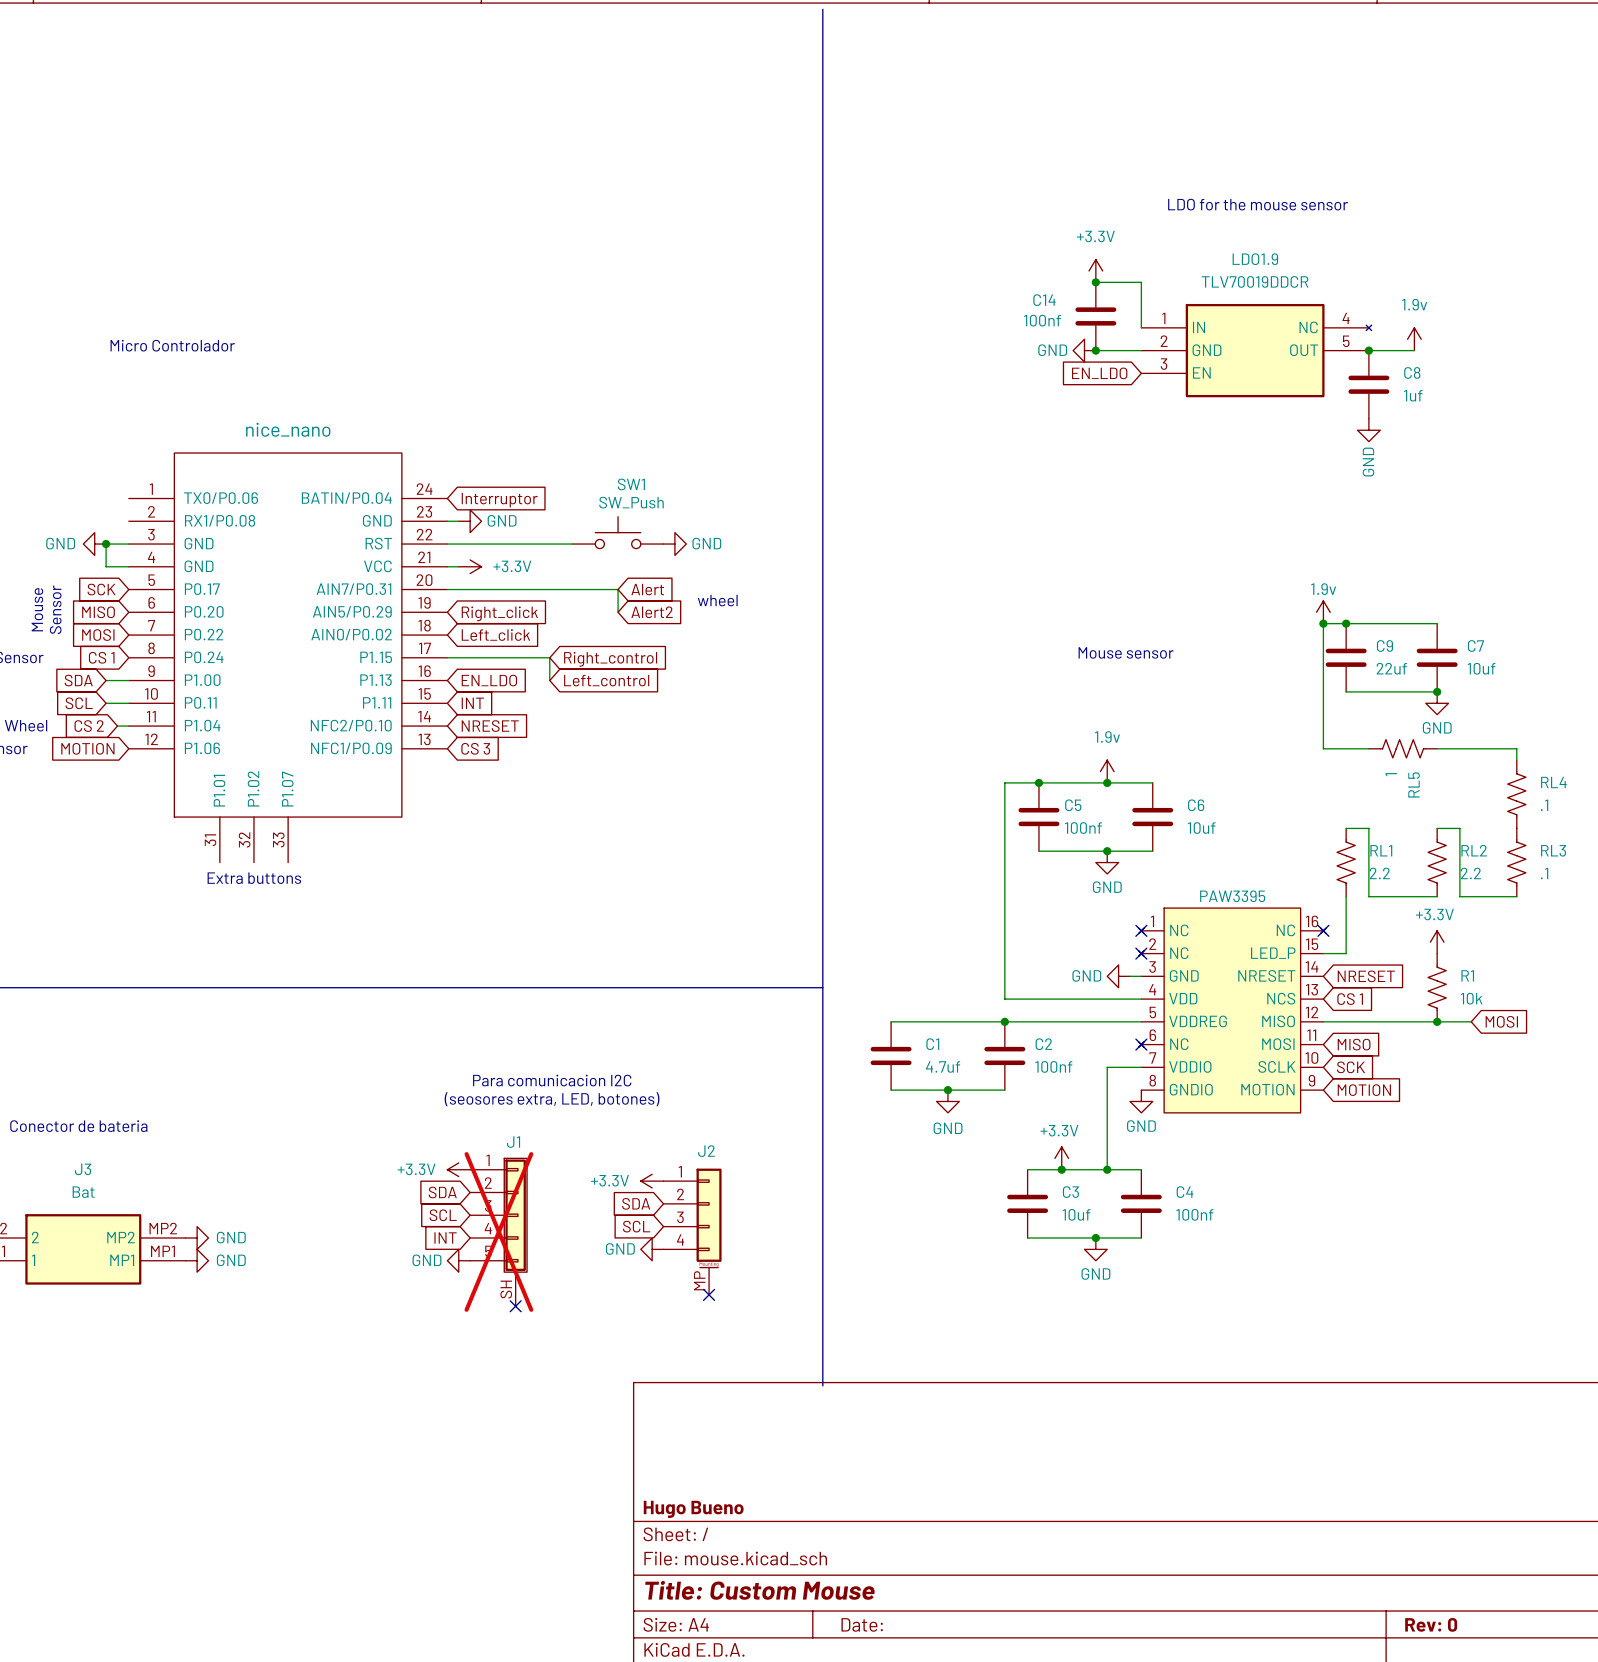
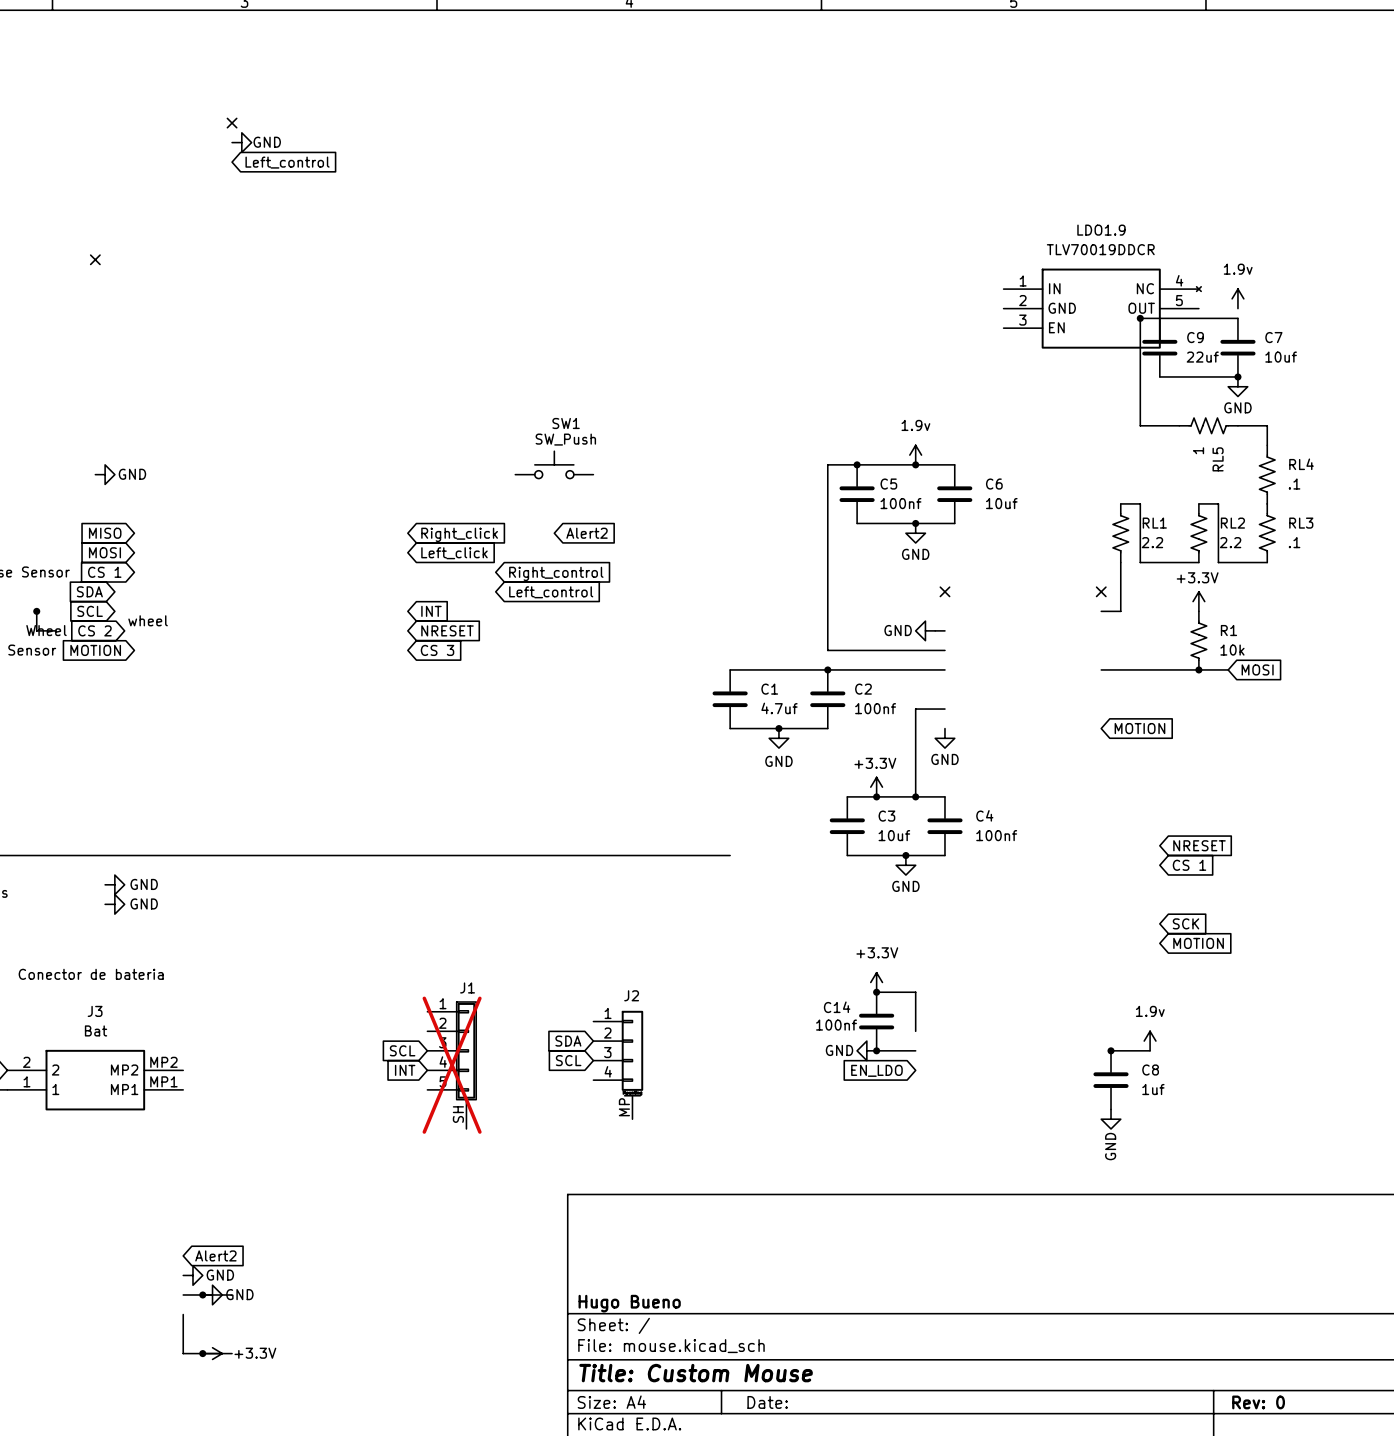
line: (822, 9) (822, 1385) -> none
no-connect mark: none -> (232, 123)
power symbol: none -> GND (241, 142)
global label: none -> Left_control (287, 162)
text: LDO for the mouse sensor (1258, 204) -> none
power symbol: +3.3V (1095, 270) -> none
wire: (1095, 282) (1141, 282) (1141, 327) -> none
junction: (1095, 282) -> none
no-connect mark: none -> (95, 259)
C14 position: (1095, 316) -> (876, 1021)
text: Micro Controlador (172, 345) -> none
power symbol: GND (1084, 350) -> none
wire: (1095, 350) (1141, 350) -> none
junction: (1095, 350) -> none
wire: (1368, 350) (1414, 350) -> none
junction: (1368, 350) -> none
junction: none -> (1140, 318)
wire: none -> (1237, 318) (1140, 318) (1140, 425) (1179, 425)
global label: EN_LDO (1099, 373) -> none
C8 position: (1368, 384) -> (1111, 1080)
wire: none -> (1159, 376) (1237, 376)
power symbol position: GND (1368, 430) -> GND (1237, 386)
junction: none -> (1237, 376)
power symbol text rotation: 0° (1368, 462) -> 90° clockwise (1237, 407)
wire: none -> (1237, 425) (1267, 425) (1267, 445)
global label: Interruptor (499, 500) -> none
wire: (447, 521) (458, 521) -> none
power symbol: GND (470, 521) -> none
power symbol: none -> 1.9v (915, 455)
junction: none -> (857, 464)
junction: none -> (915, 464)
wire: none -> (954, 464) (827, 464) (827, 650) (944, 650)
power symbol rotation: 0° (94, 544) -> 180° (105, 474)
junction: (106, 544) -> none
wire: (128, 544) (106, 544) (106, 566) (128, 566) -> none
wire: (447, 544) (572, 544) -> none
power symbol: GND (674, 544) -> none
wire: (447, 566) (458, 566) -> none
power symbol: +3.3V (470, 566) -> none
wire: none -> (1120, 503) (1140, 503) (1140, 562) (1198, 562)
wire: none -> (1198, 503) (1218, 503) (1218, 562) (1267, 562)
global label: SCK (101, 589) -> none
wire: (447, 589) (618, 589) (618, 612) -> none
global label: Alert (647, 589) -> none
text: wheel (717, 600) -> none
wire: none -> (857, 523) (954, 523)
junction: none -> (915, 523)
text: Mouse (37, 609) -> none
text: Sensor (55, 609) -> none
power symbol: none -> GND (915, 533)
power symbol: 1.9v (1323, 612) -> none
junction: (1323, 623) -> none
junction: (1346, 623) -> none
wire: (1437, 623) (1323, 623) (1323, 748) (1368, 748) -> none
wire: none -> (1120, 562) (1120, 611) (1101, 611)
text: Mouse sensor (1126, 652) -> none
part: nice_nano (288, 657) -> none
wire: (447, 657) (549, 657) (549, 680) -> none
C9 position: (1346, 657) -> (1159, 347)
C7 position: (1437, 657) -> (1237, 347)
wire: (106, 680) (128, 680) -> none
global label: EN_LDO (489, 680) -> none
no-connect mark: none -> (944, 591)
no-connect mark: none -> (1101, 591)
wire: (1346, 691) (1437, 691) -> none
power symbol: none -> +3.3V (1198, 601)
junction: (1437, 691) -> none
wire: none -> (36, 611) (36, 630) (56, 630)
junction: none -> (36, 611)
wire: (106, 703) (128, 703) -> none
power symbol: GND (1437, 703) -> none
text: none -> wheel (148, 620)
wire: (117, 726) (128, 726) -> none
power symbol: none -> GND (925, 630)
wire: none -> (935, 630) (944, 630)
RL5 position: (1403, 748) -> (1208, 425)
wire: (1437, 748) (1516, 748) (1516, 760) -> none
wire: none -> (730, 669) (944, 669)
junction: none -> (827, 669)
power symbol: 1.9v (1107, 771) -> none
wire: none -> (1101, 669) (1228, 669)
junction: none -> (1198, 669)
global label: none -> MOSI (1257, 669)
junction: (1038, 782) -> none
junction: (1107, 782) -> none
wire: (1152, 782) (1004, 782) (1004, 999) (1141, 999) -> none
RL4 position: (1516, 794) -> (1267, 474)
C5 position: (1038, 817) -> (857, 494)
wire: none -> (944, 709) (915, 709) (915, 796)
C6 position: (1152, 817) -> (954, 494)
wire: (1346, 828) (1368, 828) (1368, 896) (1437, 896) -> none
wire: (1437, 828) (1459, 828) (1459, 896) (1516, 896) -> none
wire: none -> (730, 728) (827, 728)
junction: none -> (778, 728)
global label: none -> MOTION (1139, 728)
power symbol: none -> GND (778, 738)
wire: (1038, 851) (1152, 851) -> (847, 796) (944, 796)
junction: (1107, 851) -> none
power symbol position: GND (1107, 862) -> GND (944, 738)
RL1 position: (1346, 862) -> (1120, 533)
RL2 position: (1437, 862) -> (1198, 533)
RL3 position: (1516, 862) -> (1267, 533)
text: Extra buttons (254, 878) -> none
wire: (1346, 896) (1346, 953) (1323, 953) -> none
power symbol: none -> +3.3V (876, 787)
junction: none -> (876, 796)
junction: none -> (915, 796)
no-connect mark: (1141, 930) -> none
no-connect mark: (1323, 930) -> none
power symbol: +3.3V (1437, 942) -> none
no-connect mark: (1141, 953) -> none
power symbol: GND (1118, 976) -> none
wire: (1129, 976) (1141, 976) -> none
R1 position: (1437, 987) -> (1198, 640)
power symbol: none -> GND (905, 865)
part: PAW3395 (1232, 1010) -> none
power symbol: none -> GND (114, 884)
wire: (891, 1021) (1141, 1021) -> none
junction position: (1004, 1021) -> (905, 855)
wire: (1323, 1021) (1471, 1021) -> none
junction: (1437, 1021) -> none
global label: MOSI (1501, 1021) -> none
power symbol: none -> GND (114, 904)
no-connect mark: (1141, 1044) -> none
global label: MISO (1354, 1044) -> none
C1 position: (891, 1055) -> (730, 699)
C2 position: (1004, 1055) -> (827, 699)
wire: (1141, 1067) (1107, 1067) (1107, 1169) -> none
text: Para comunicacion I2C (552, 1080) -> none
wire: (891, 1090) (1004, 1090) -> (847, 855) (944, 855)
junction: (947, 1090) -> none
text: (seosores extra, LED, botones) (552, 1099) -> none
power symbol: GND (947, 1101) -> none
power symbol: GND (1141, 1101) -> none
power symbol text position: +3.3V (1059, 1130) -> +3.3V (877, 952)
wire: none -> (876, 992) (915, 992) (915, 1031)
junction: none -> (876, 992)
power symbol position: +3.3V (1061, 1158) -> +3.3V (876, 982)
power symbol: +3.3V (458, 1169) -> none
wire: (1027, 1169) (1141, 1169) -> none
junction: (1061, 1169) -> none
junction: (1107, 1169) -> none
power symbol: +3.3V (652, 1181) -> none
global label: SDA (442, 1192) -> none
C3 position: (1027, 1203) -> (847, 826)
C4 position: (1141, 1203) -> (944, 826)
power symbol: none -> 1.9v (1150, 1041)
power symbol: none -> GND (866, 1050)
wire: none -> (876, 1050) (915, 1050)
junction: none -> (876, 1050)
wire: none -> (1111, 1050) (1150, 1050)
junction: none -> (1111, 1050)
power symbol: GND (197, 1238) -> none
global label: none -> EN_LDO (876, 1070)
wire: (1027, 1238) (1141, 1238) -> none
junction: (1095, 1238) -> none
power symbol: GND (652, 1249) -> none
power symbol: GND (1095, 1249) -> none
power symbol: GND (197, 1260) -> none
power symbol: GND (458, 1260) -> none
no-connect mark: (709, 1294) -> none
power symbol: none -> GND (1111, 1119)
no-connect mark: (515, 1306) -> none
global label: none -> Alert2 (215, 1255)
power symbol: none -> GND (193, 1275)
wire: none -> (183, 1294) (232, 1294)
junction: none -> (202, 1294)
power symbol: none -> GND (212, 1294)
wire: none -> (183, 1314) (183, 1353) (232, 1353)
junction: none -> (202, 1353)
power symbol: none -> +3.3V (212, 1353)

